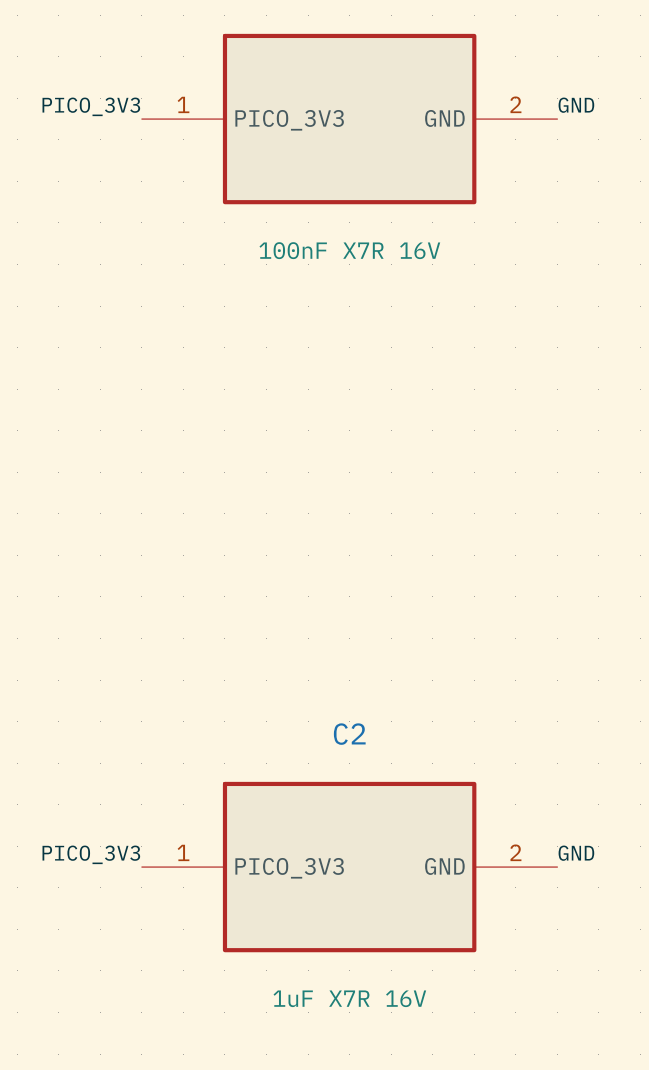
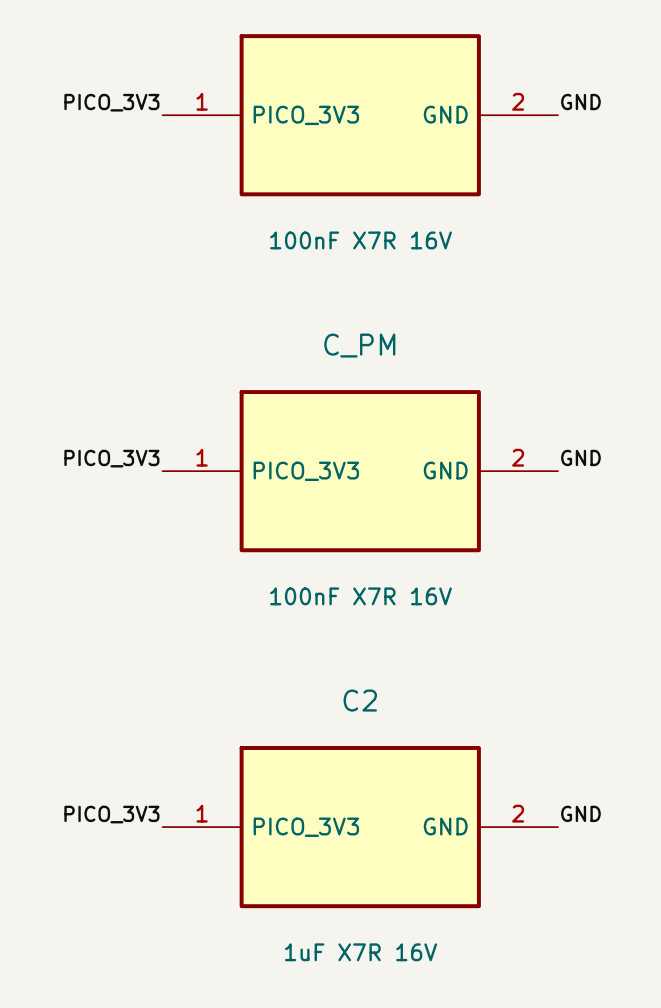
label: none -> GND (580, 457)
label: none -> PICO_3V3 (111, 458)
C_PM: none -> 100nF X7R 16V (360, 471)

